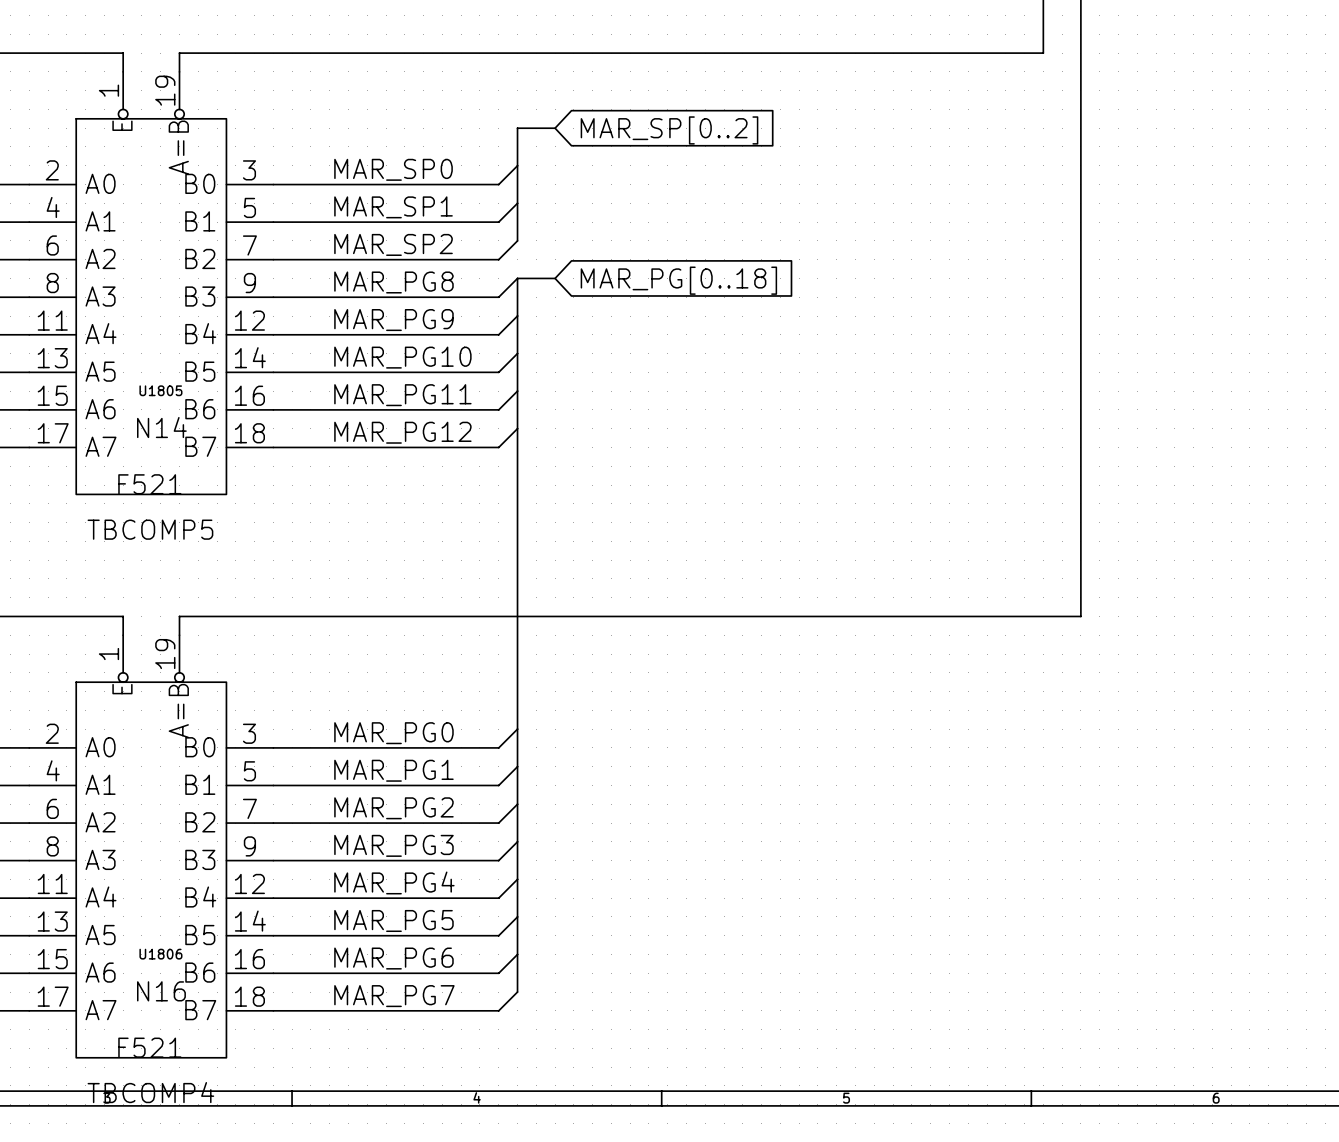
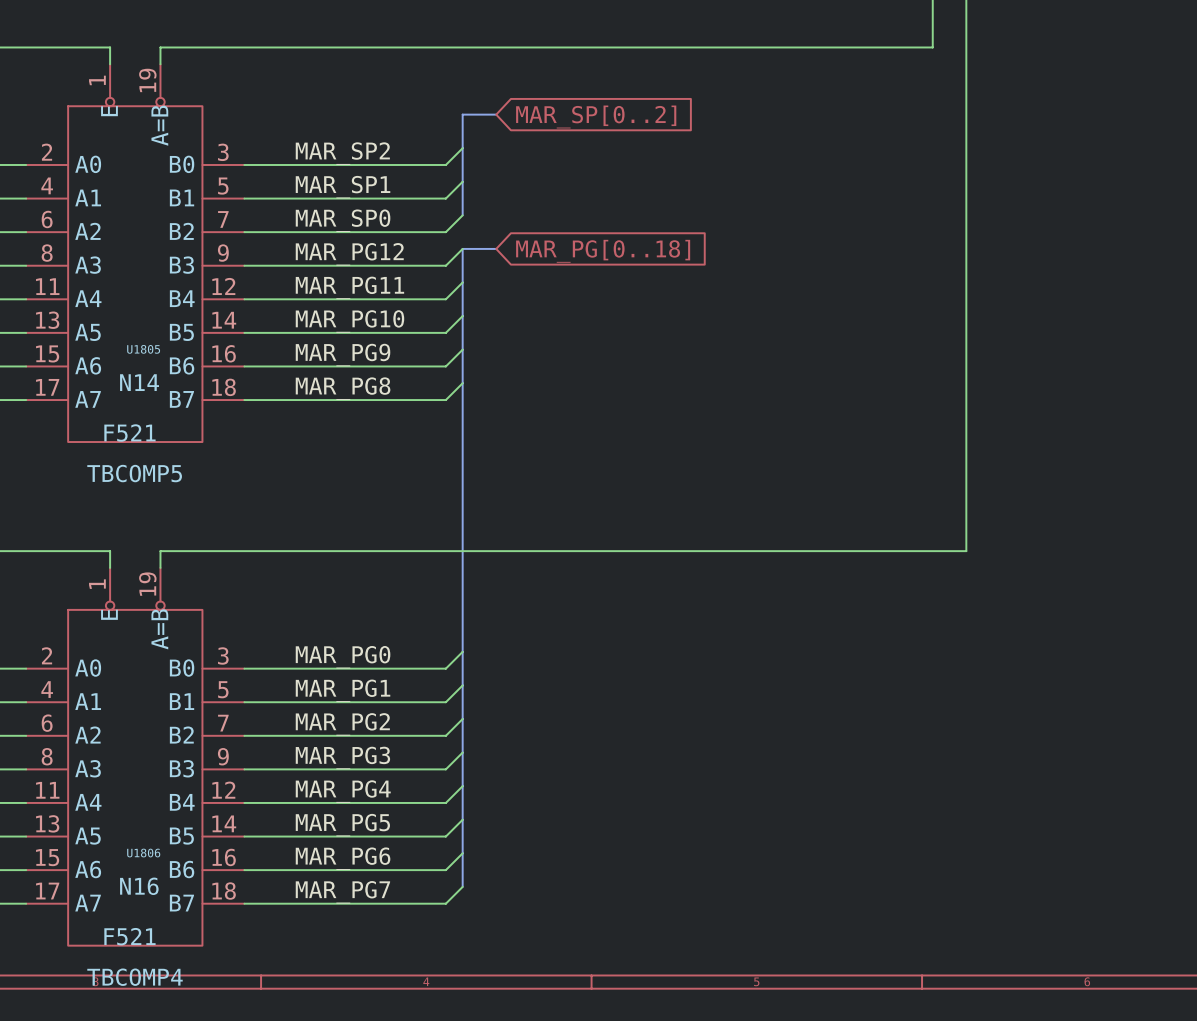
label: MAR_SP0 (393, 169) -> MAR_SP2 (342, 153)
label: MAR_SP2 (393, 244) -> MAR_SP0 (343, 220)
label: MAR_PG8 (393, 282) -> MAR_PG12 (349, 254)
label: MAR_PG9 (393, 320) -> MAR_PG11 (349, 287)
label: MAR_PG11 (402, 395) -> MAR_PG9 (343, 355)
label: MAR_PG12 (402, 432) -> MAR_PG8 (343, 388)

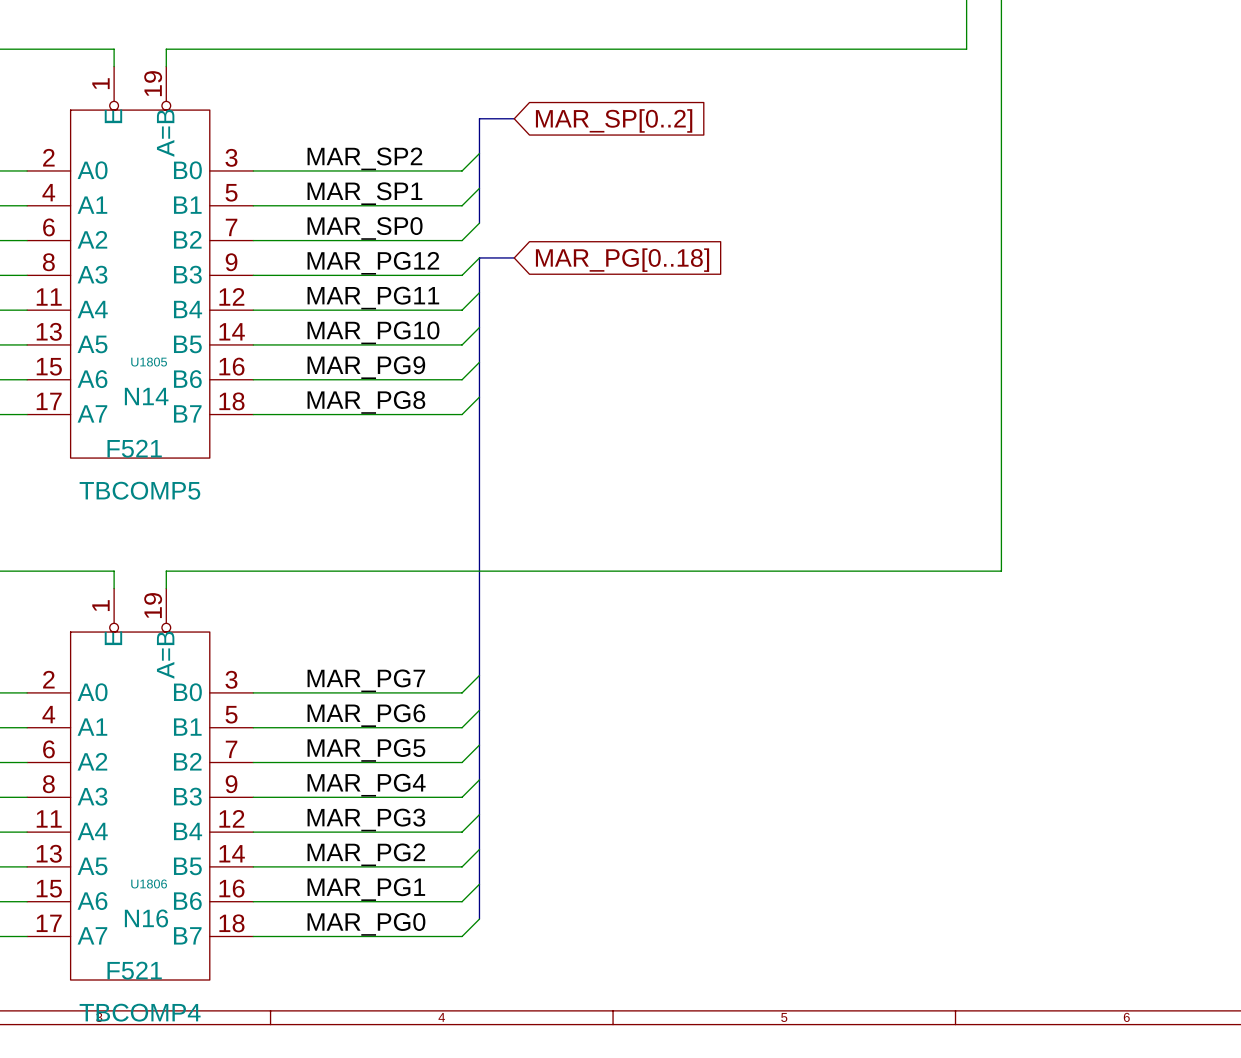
label: MAR_PG0 (343, 657) -> MAR_PG7 (366, 680)
label: MAR_PG1 (343, 690) -> MAR_PG6 (366, 715)
label: MAR_PG2 (342, 724) -> MAR_PG5 (366, 750)
label: MAR_PG3 (342, 757) -> MAR_PG4 (366, 785)
label: MAR_PG4 (343, 791) -> MAR_PG3 (366, 820)
label: MAR_PG5 (342, 825) -> MAR_PG2 (366, 854)
label: MAR_PG6 (343, 858) -> MAR_PG1 (366, 889)
label: MAR_PG7 (342, 892) -> MAR_PG0 (366, 924)

